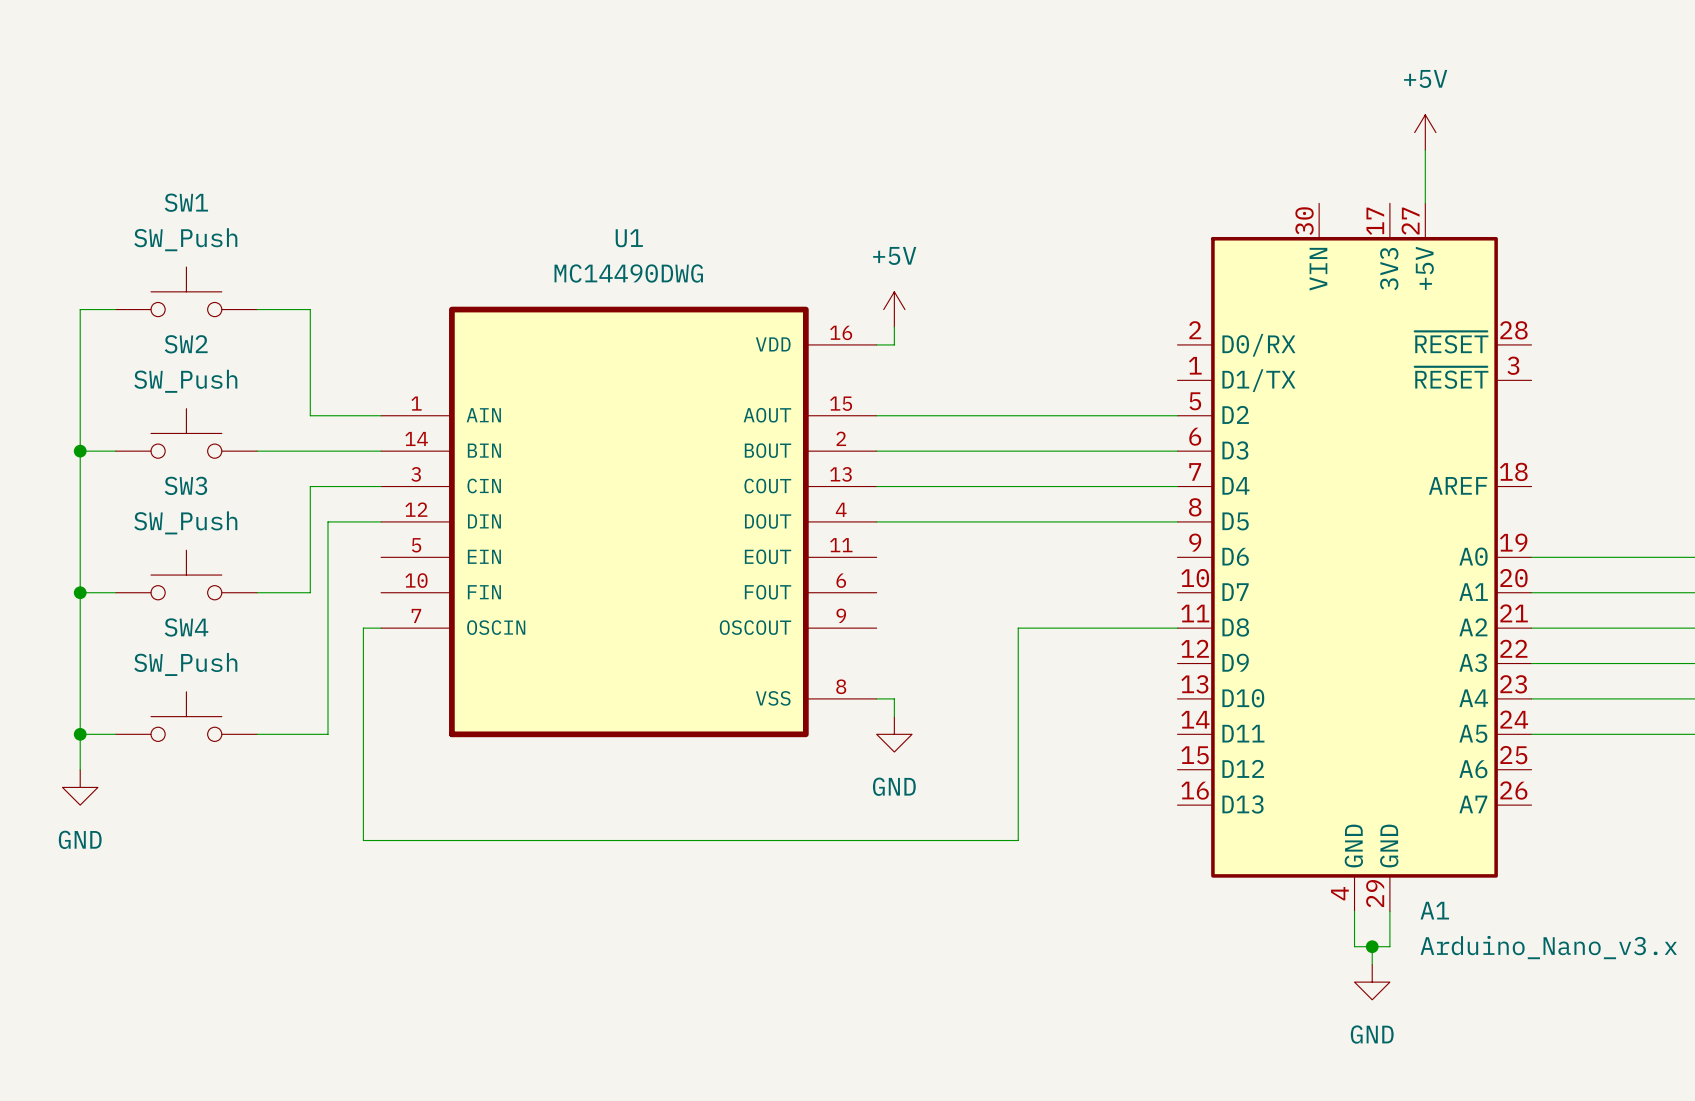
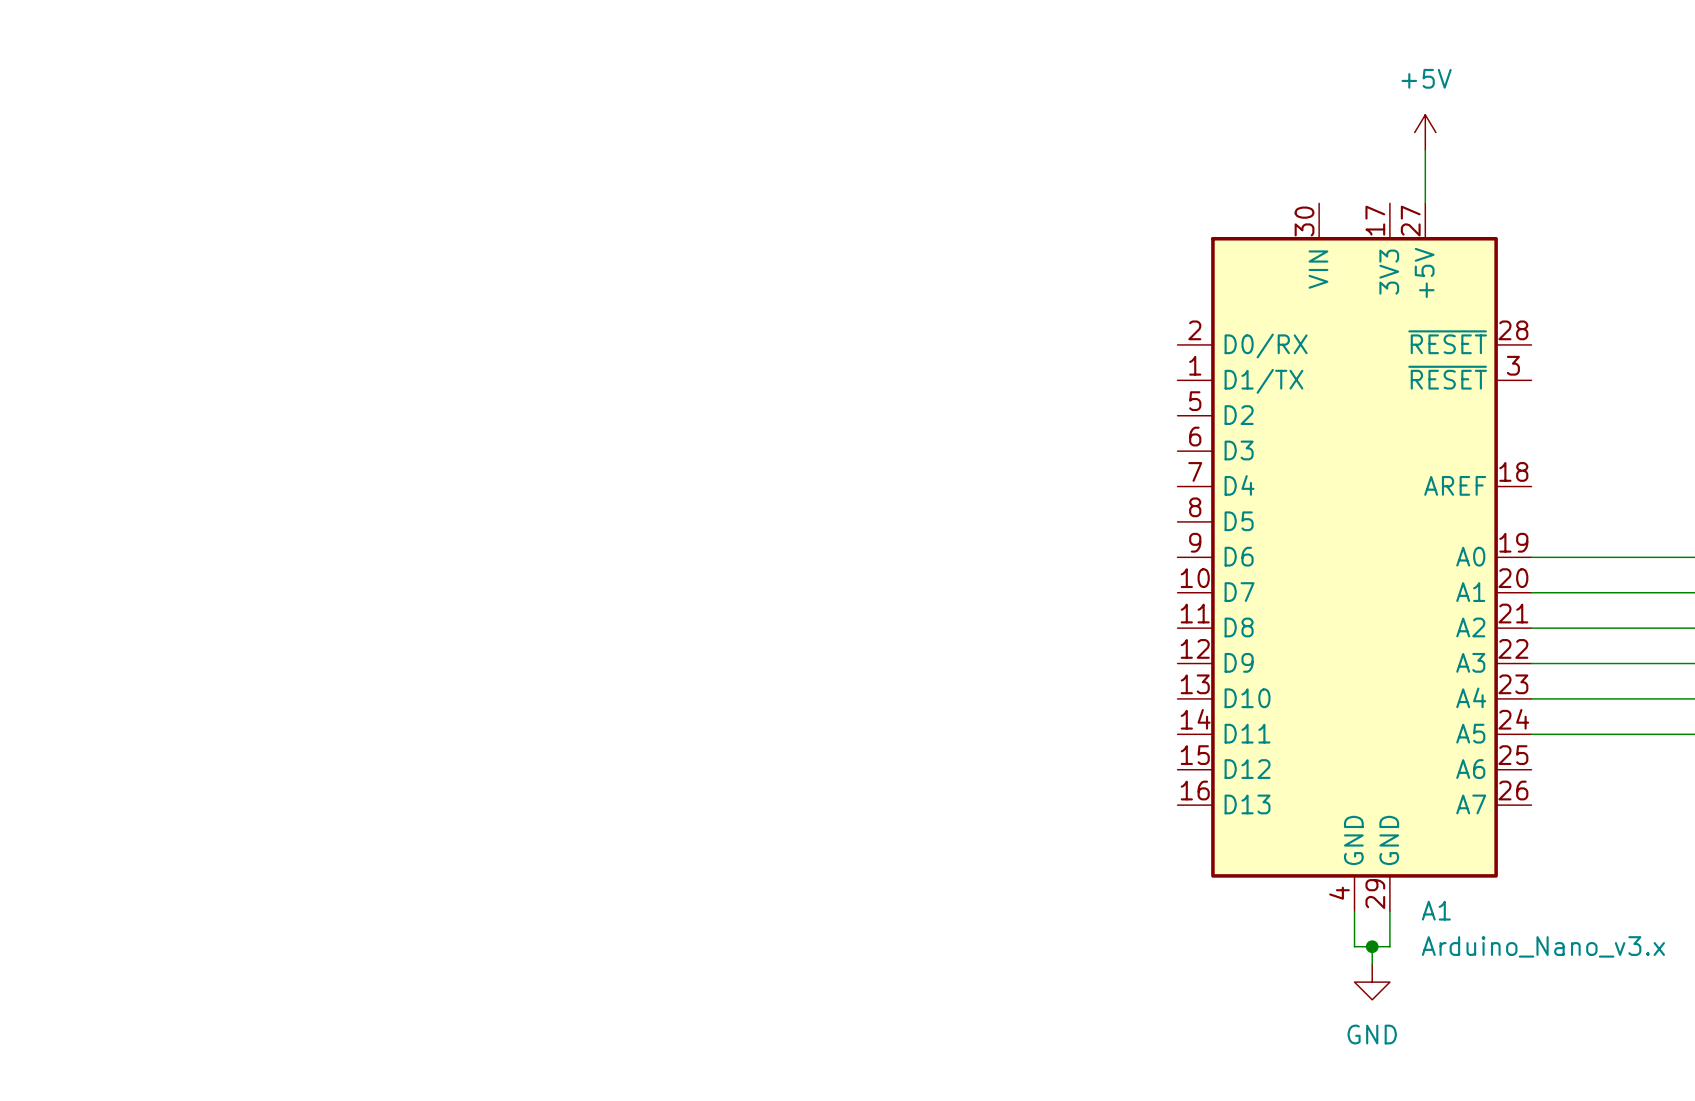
SW1: SW_Push (186, 291) -> none
wire: (115, 309) (80, 309) (80, 769) -> none
wire: (257, 309) (310, 309) (310, 415) (381, 415) -> none
power symbol: +5V (894, 309) -> none
wire: (894, 327) (894, 344) (876, 344) -> none
wire: (876, 415) (1177, 415) -> none
SW2: SW_Push (186, 433) -> none
wire: (80, 451) (115, 451) -> none
junction: (80, 451) -> none
wire: (257, 451) (381, 451) -> none
wire: (876, 451) (1177, 451) -> none
wire: (381, 486) (310, 486) (310, 592) (257, 592) -> none
wire: (876, 486) (1177, 486) -> none
wire: (381, 521) (328, 521) (328, 734) (257, 734) -> none
U1: MC14490DWG (628, 521) -> none
wire: (876, 521) (1177, 521) -> none
SW3: SW_Push (186, 575) -> none
wire: (80, 592) (115, 592) -> none
junction: (80, 592) -> none
wire: (381, 628) (363, 628) (363, 840) (1018, 840) (1018, 628) (1177, 628) -> none
wire: (876, 698) (894, 698) (894, 716) -> none
SW4: SW_Push (186, 716) -> none
wire: (80, 734) (115, 734) -> none
junction: (80, 734) -> none
power symbol: GND (894, 734) -> none
power symbol: GND (80, 787) -> none

